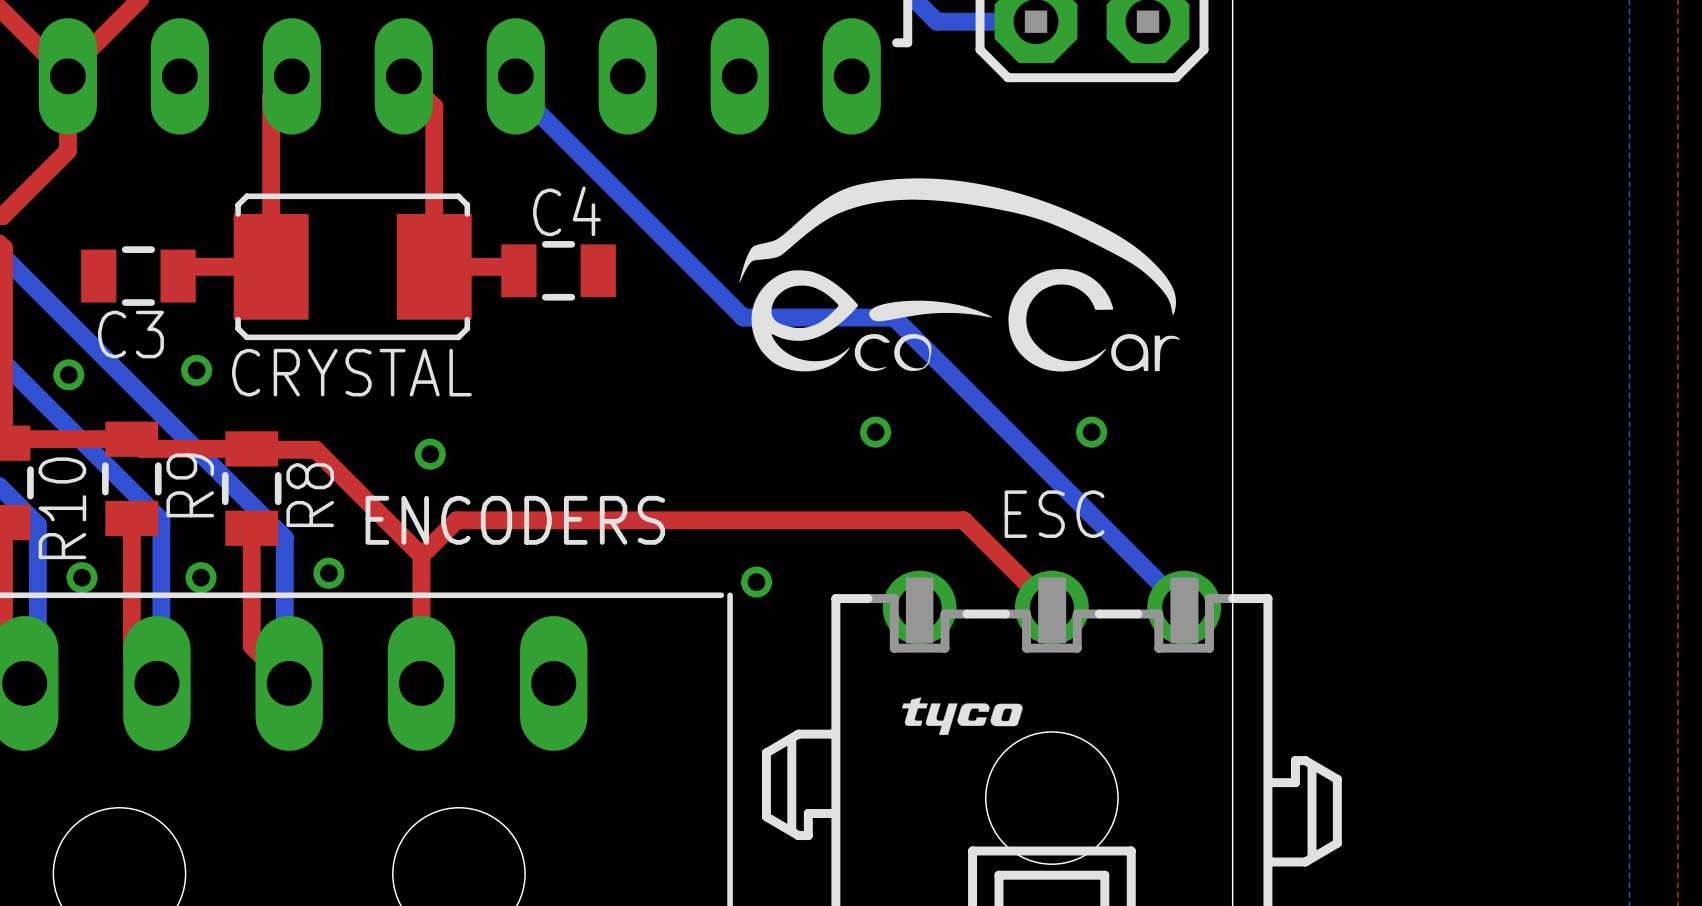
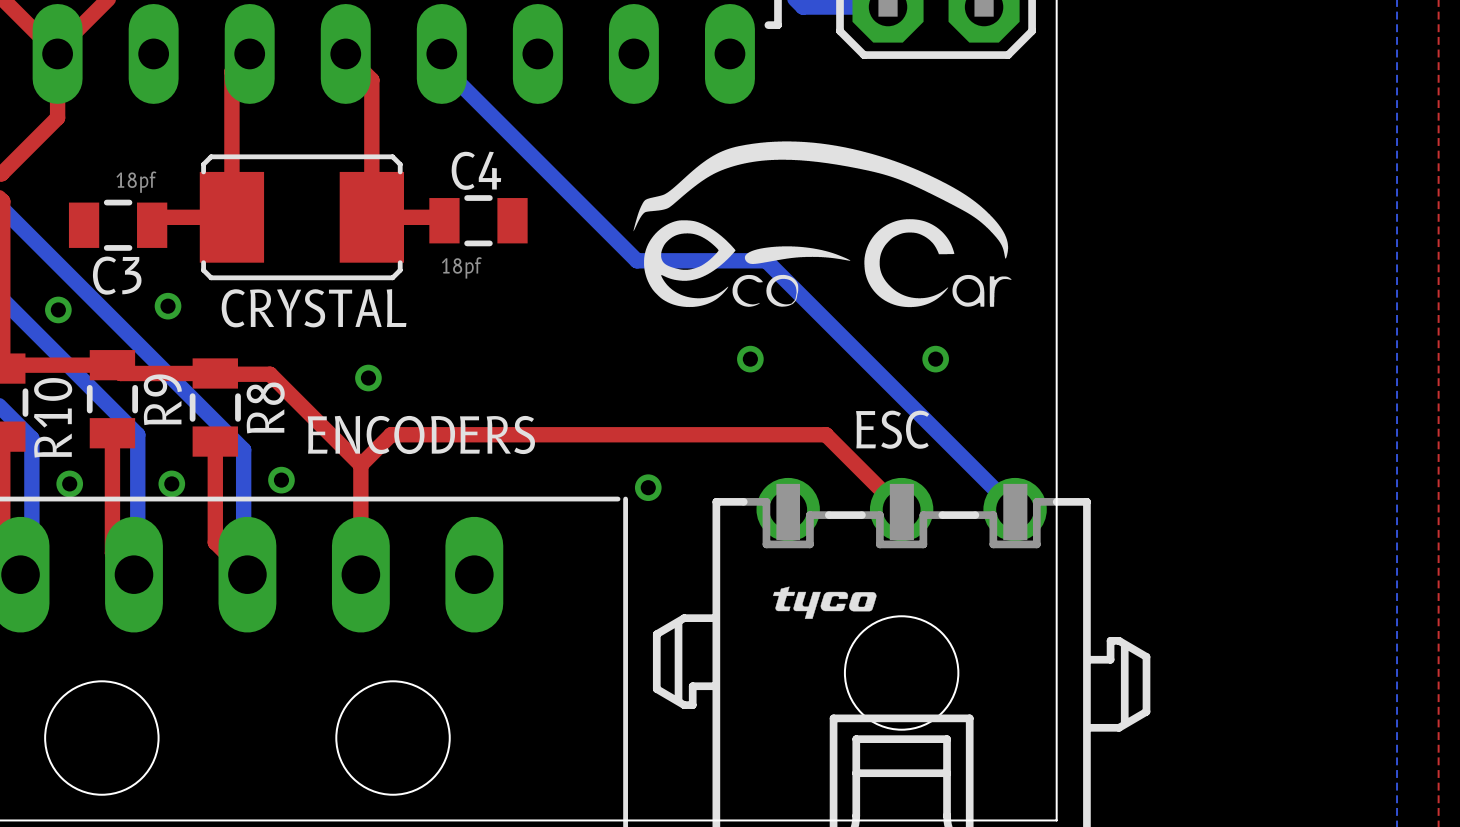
C3 value: none -> 18pf (136, 182)
C4 value: none -> 18pf (461, 267)

